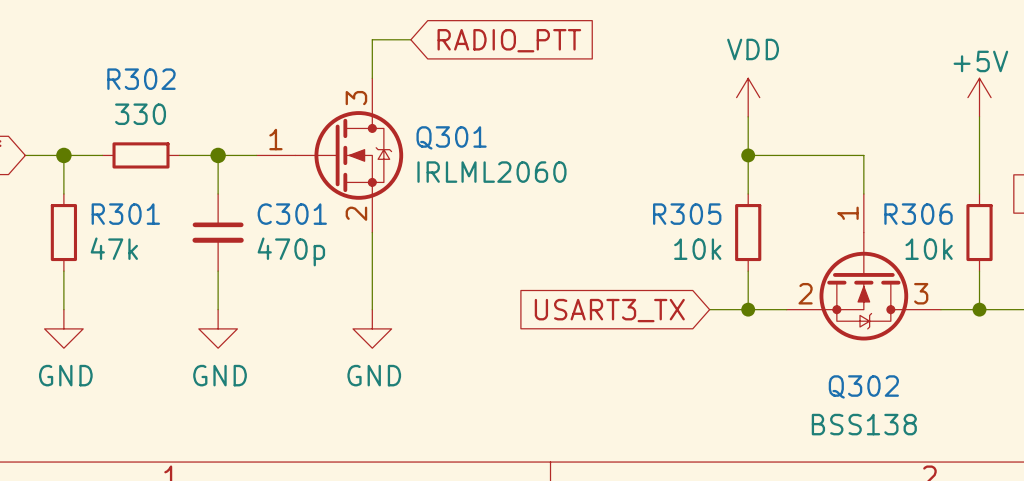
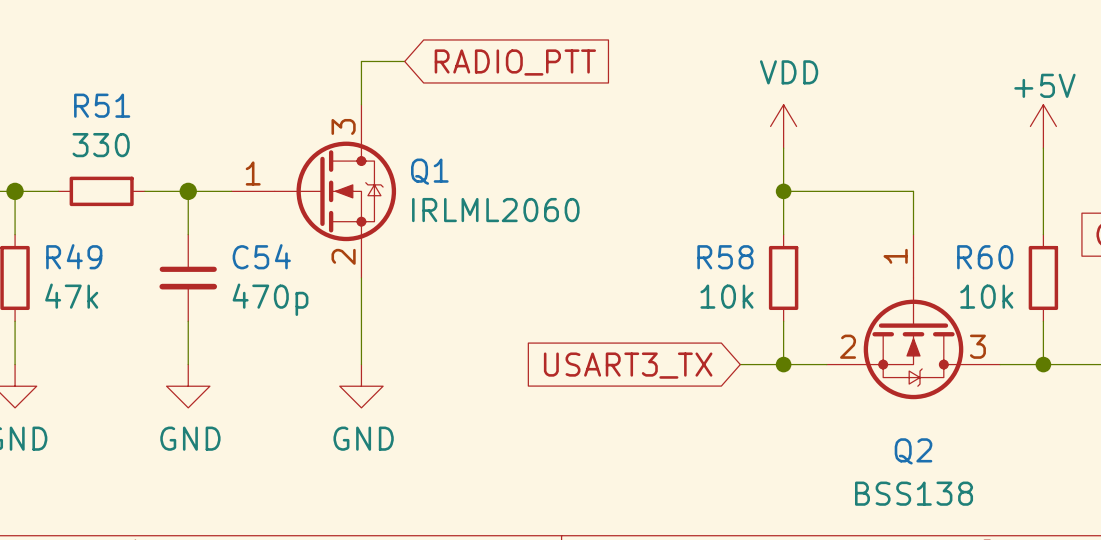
R302 name: R302 (141, 79) -> R51 (102, 105)
Q301 name: Q301 (451, 137) -> Q1 (429, 171)
R301 name: R301 (125, 214) -> R49 (74, 256)
C301 name: C301 (292, 214) -> C54 (261, 256)
R305 name: R305 (687, 214) -> R58 (725, 257)
R306 name: R306 (918, 214) -> R60 (985, 257)
Q302 name: Q302 (863, 386) -> Q2 (913, 451)

